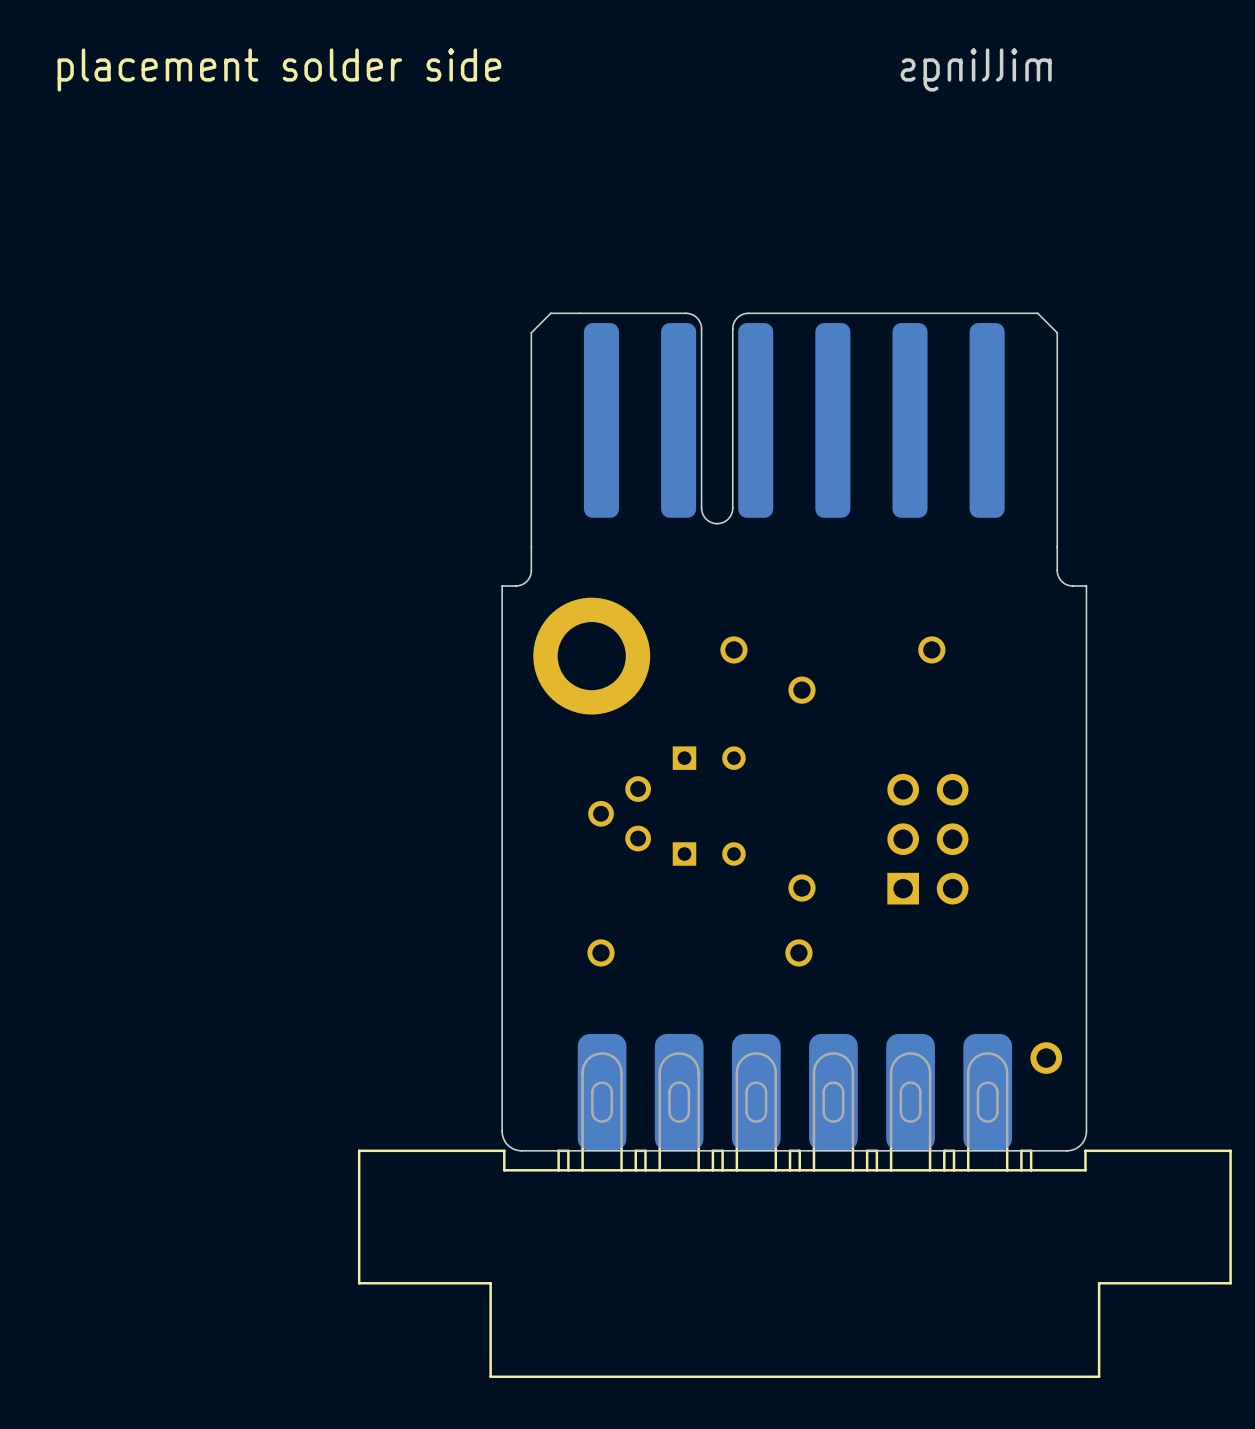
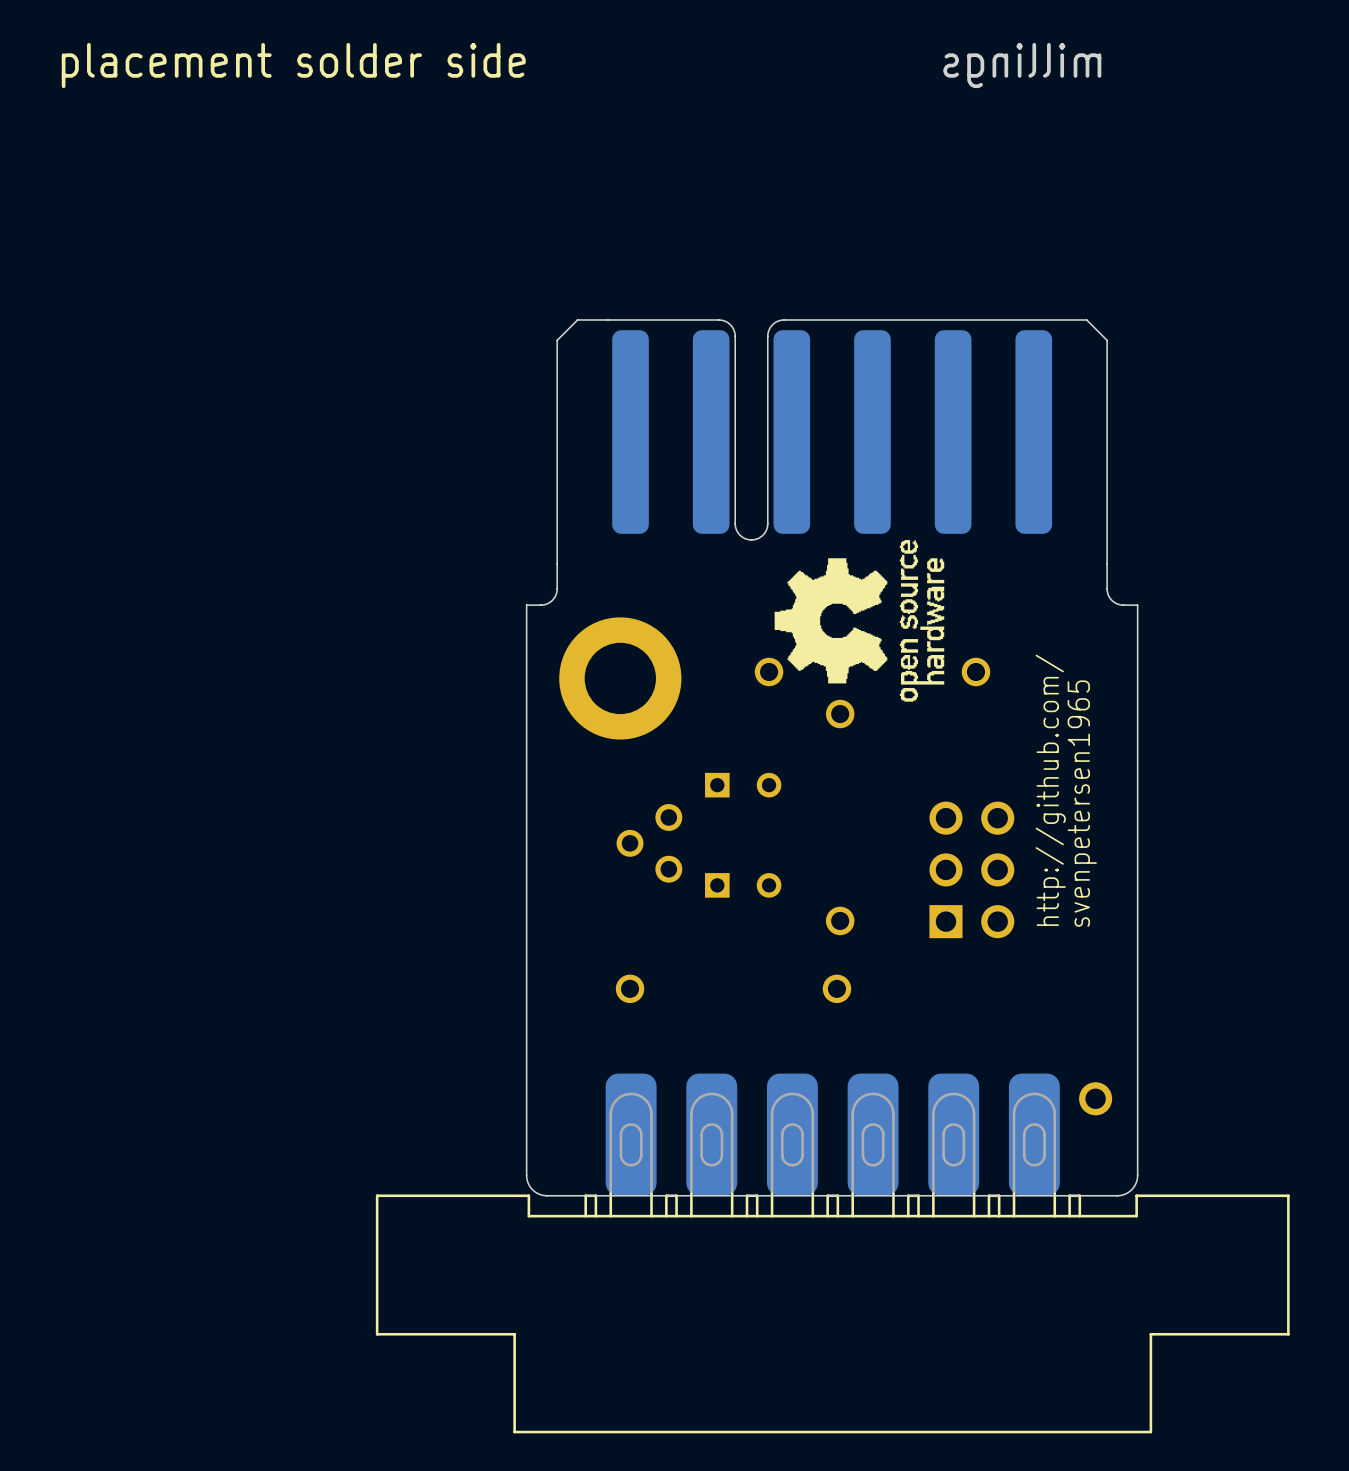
drawing: none -> [774, 540, 945, 702]
text: none -> http://github.com/ (1050, 790)
text: none -> svenpetersen1965 (1082, 803)

